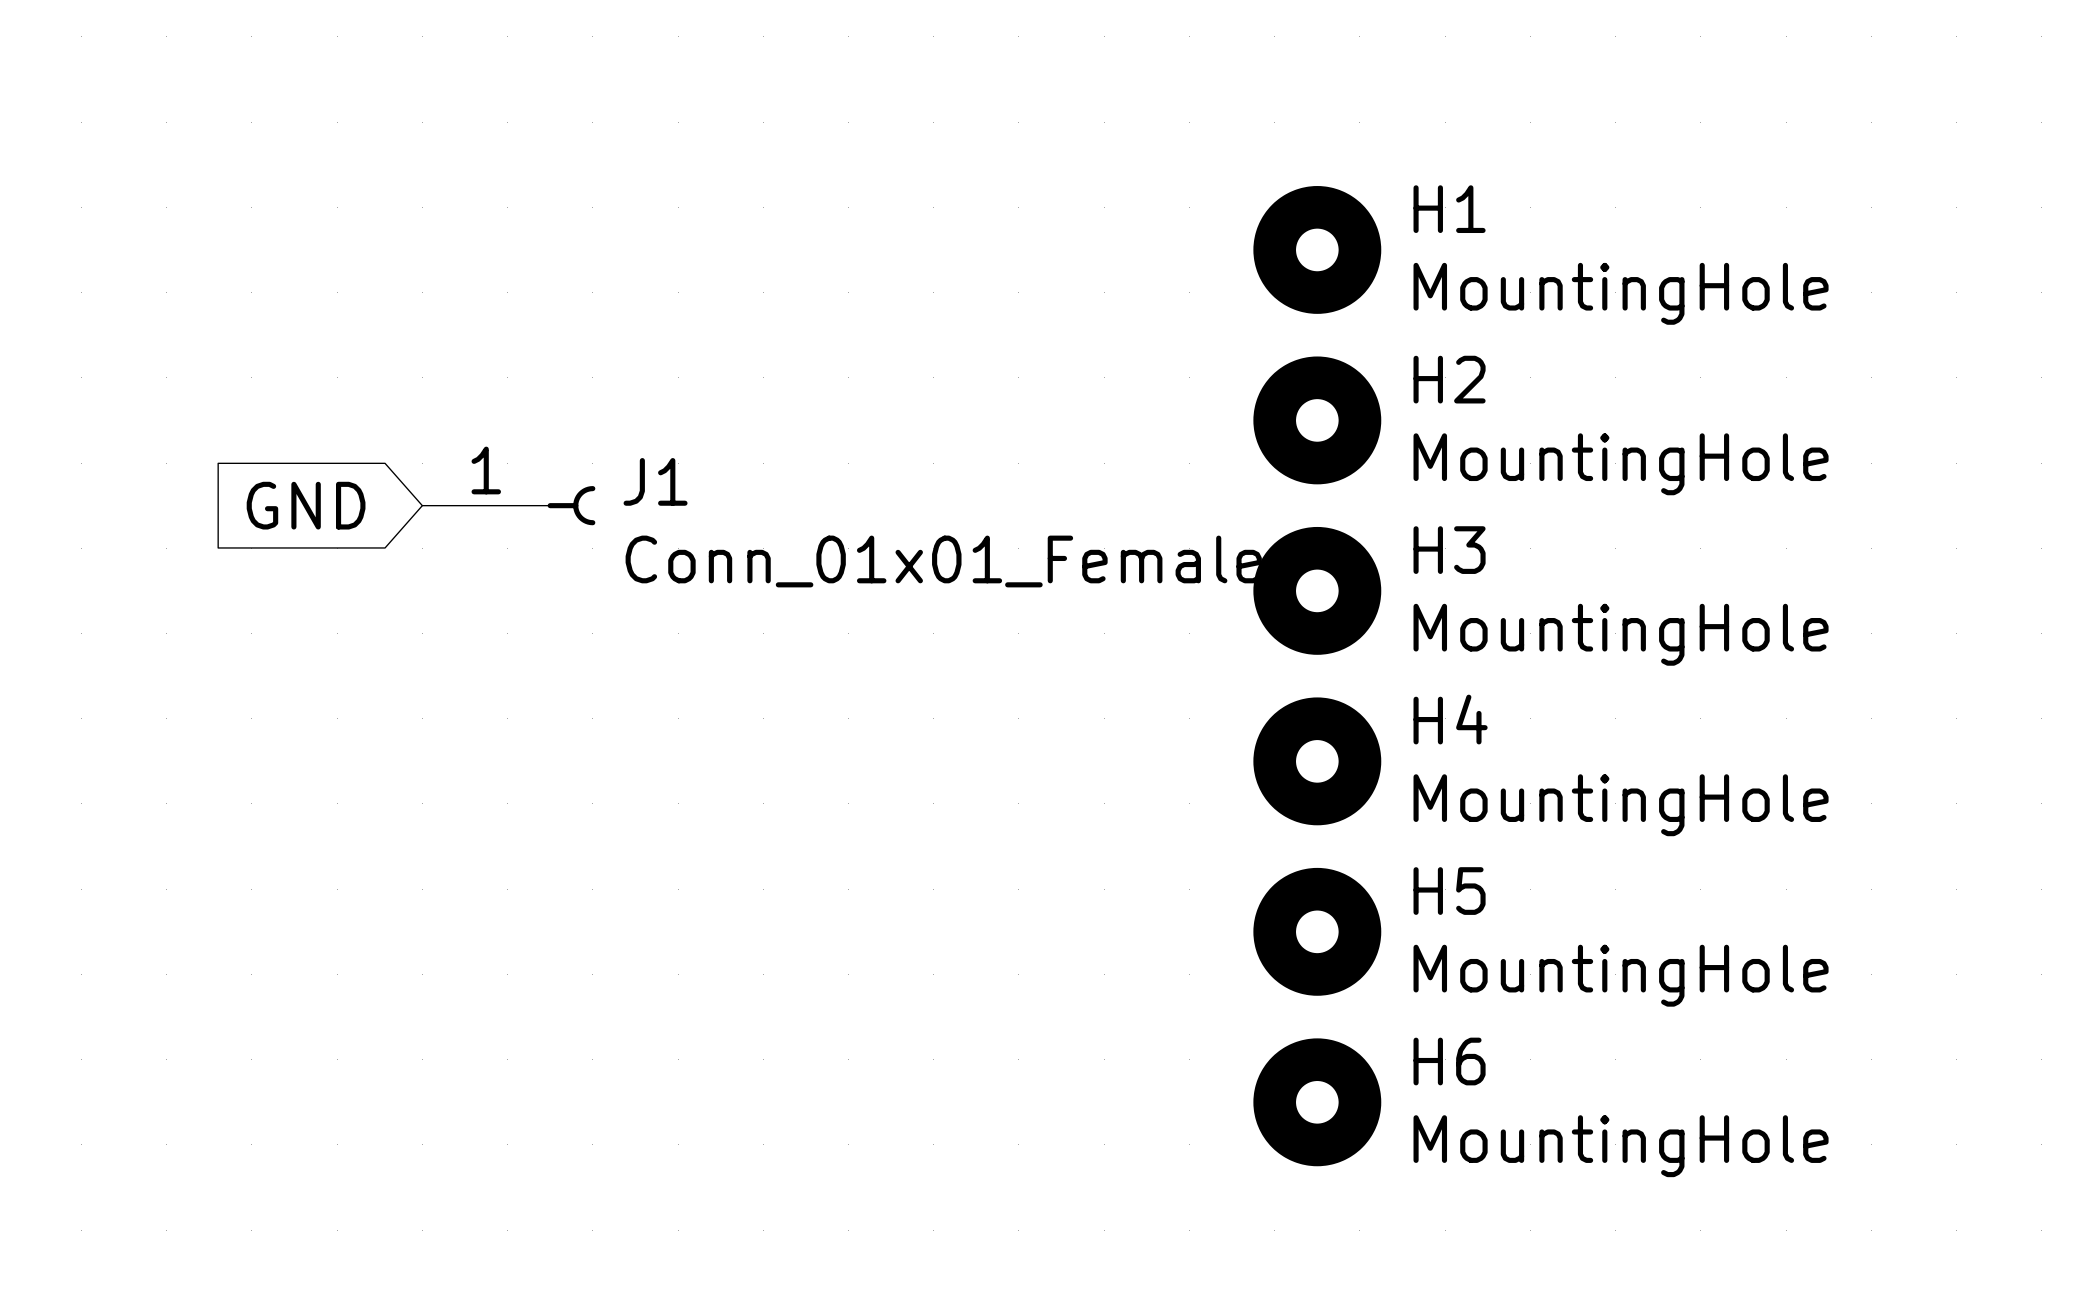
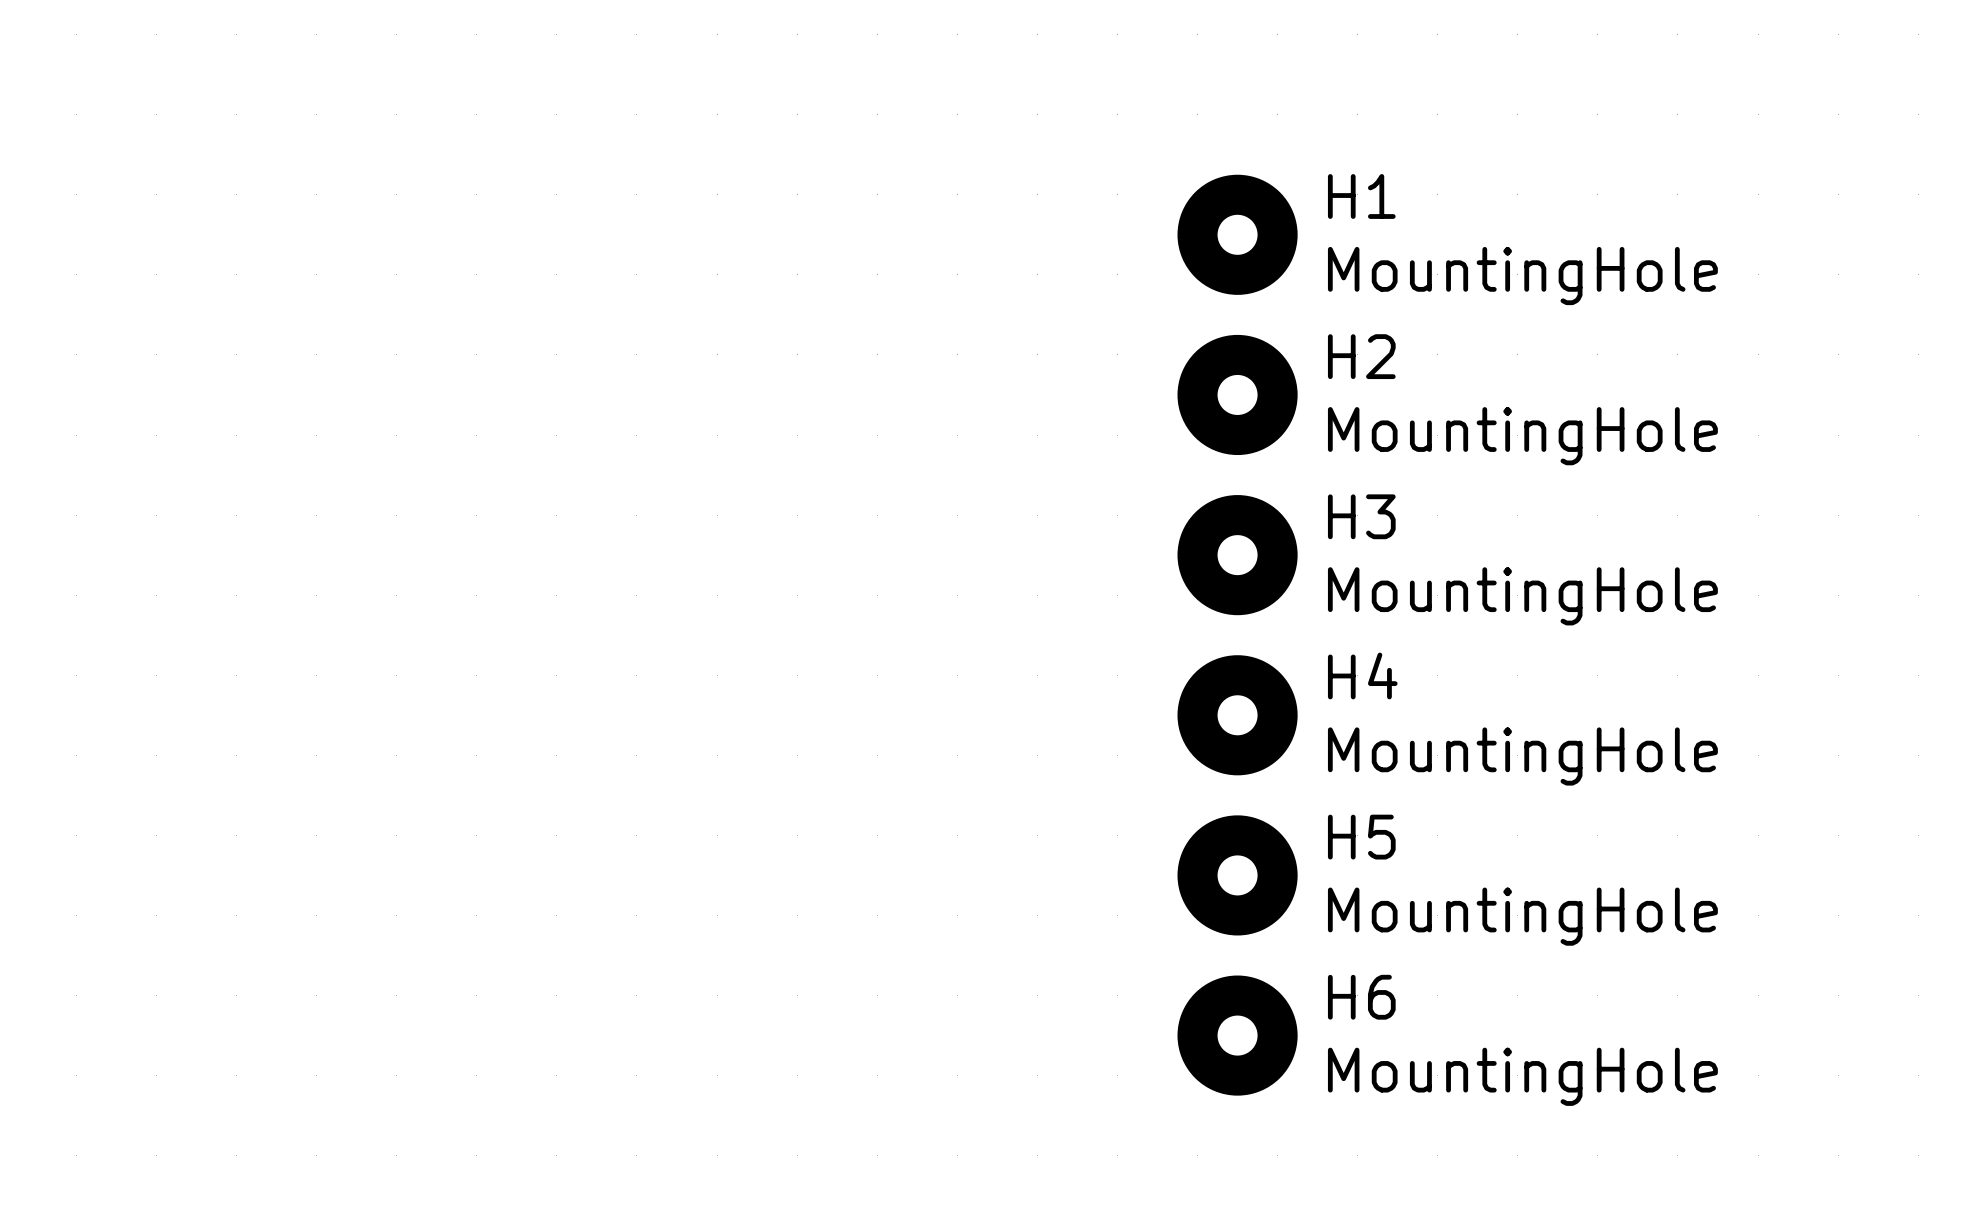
global label: GND (306, 505) -> none
J1: Conn_01x01_Female (508, 505) -> none

